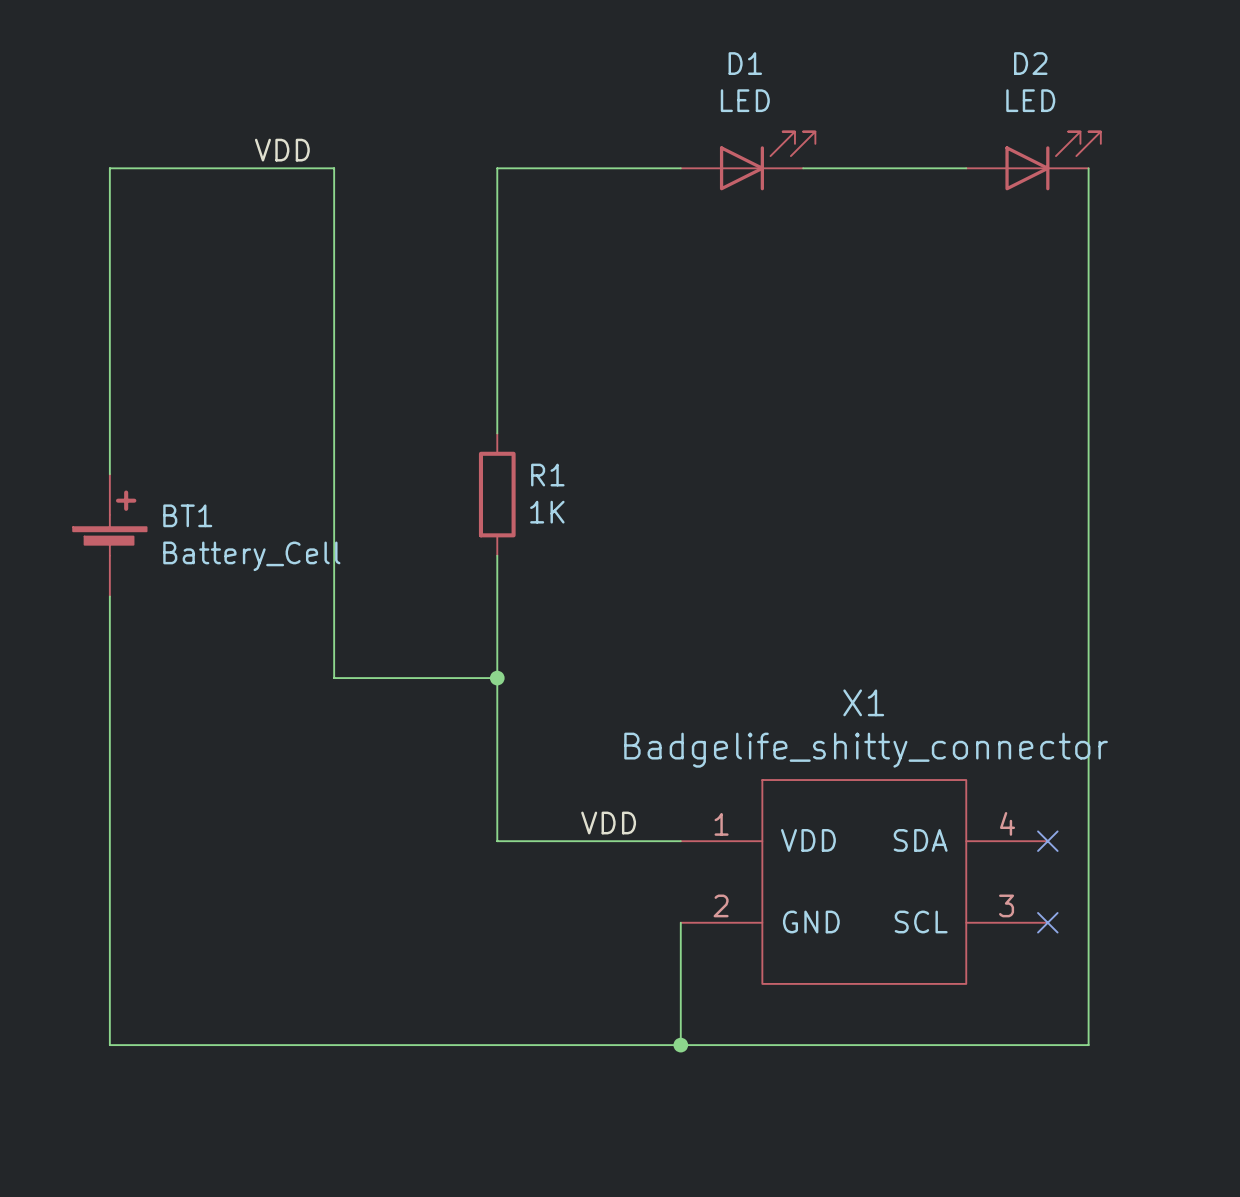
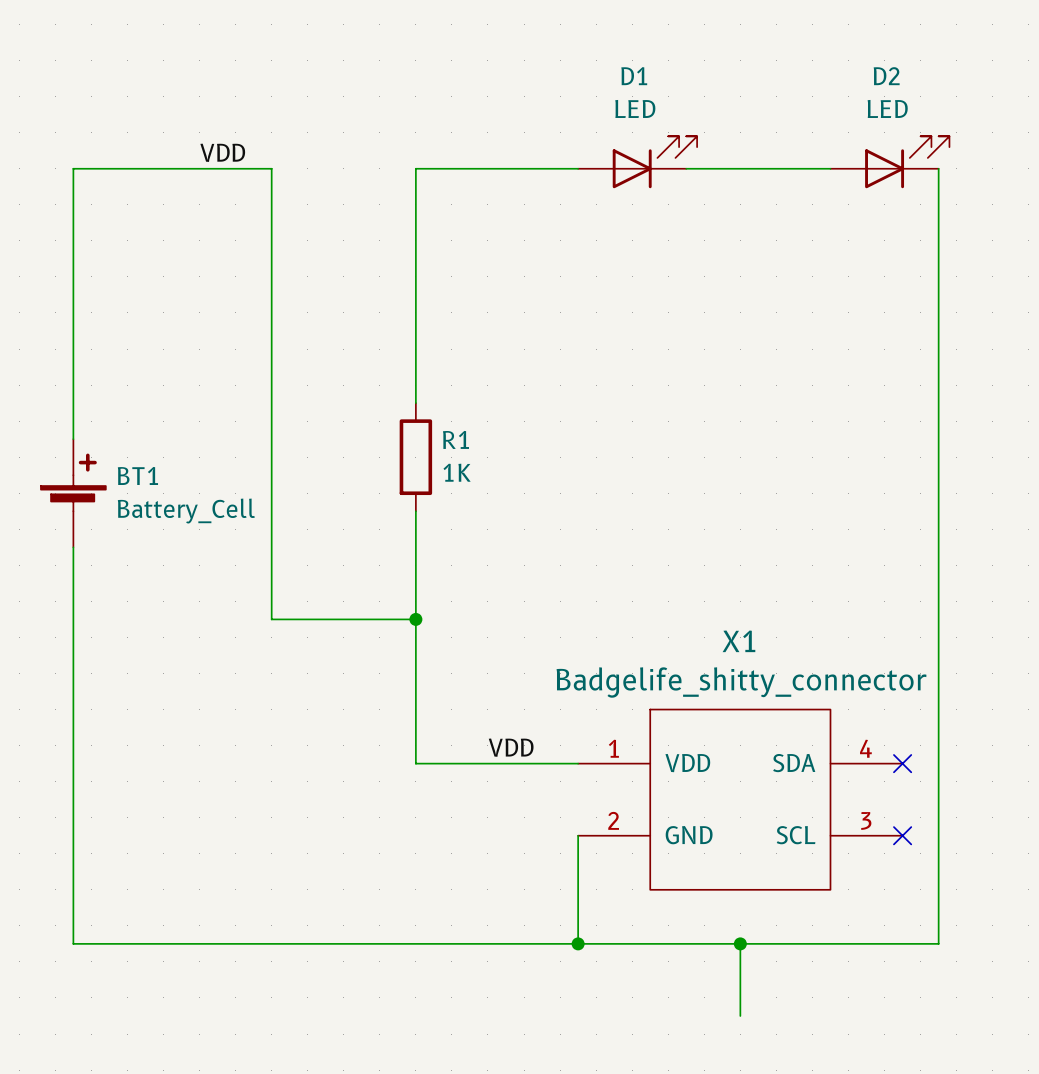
wire: none -> (740, 943) (740, 1015)
junction: none -> (740, 943)

